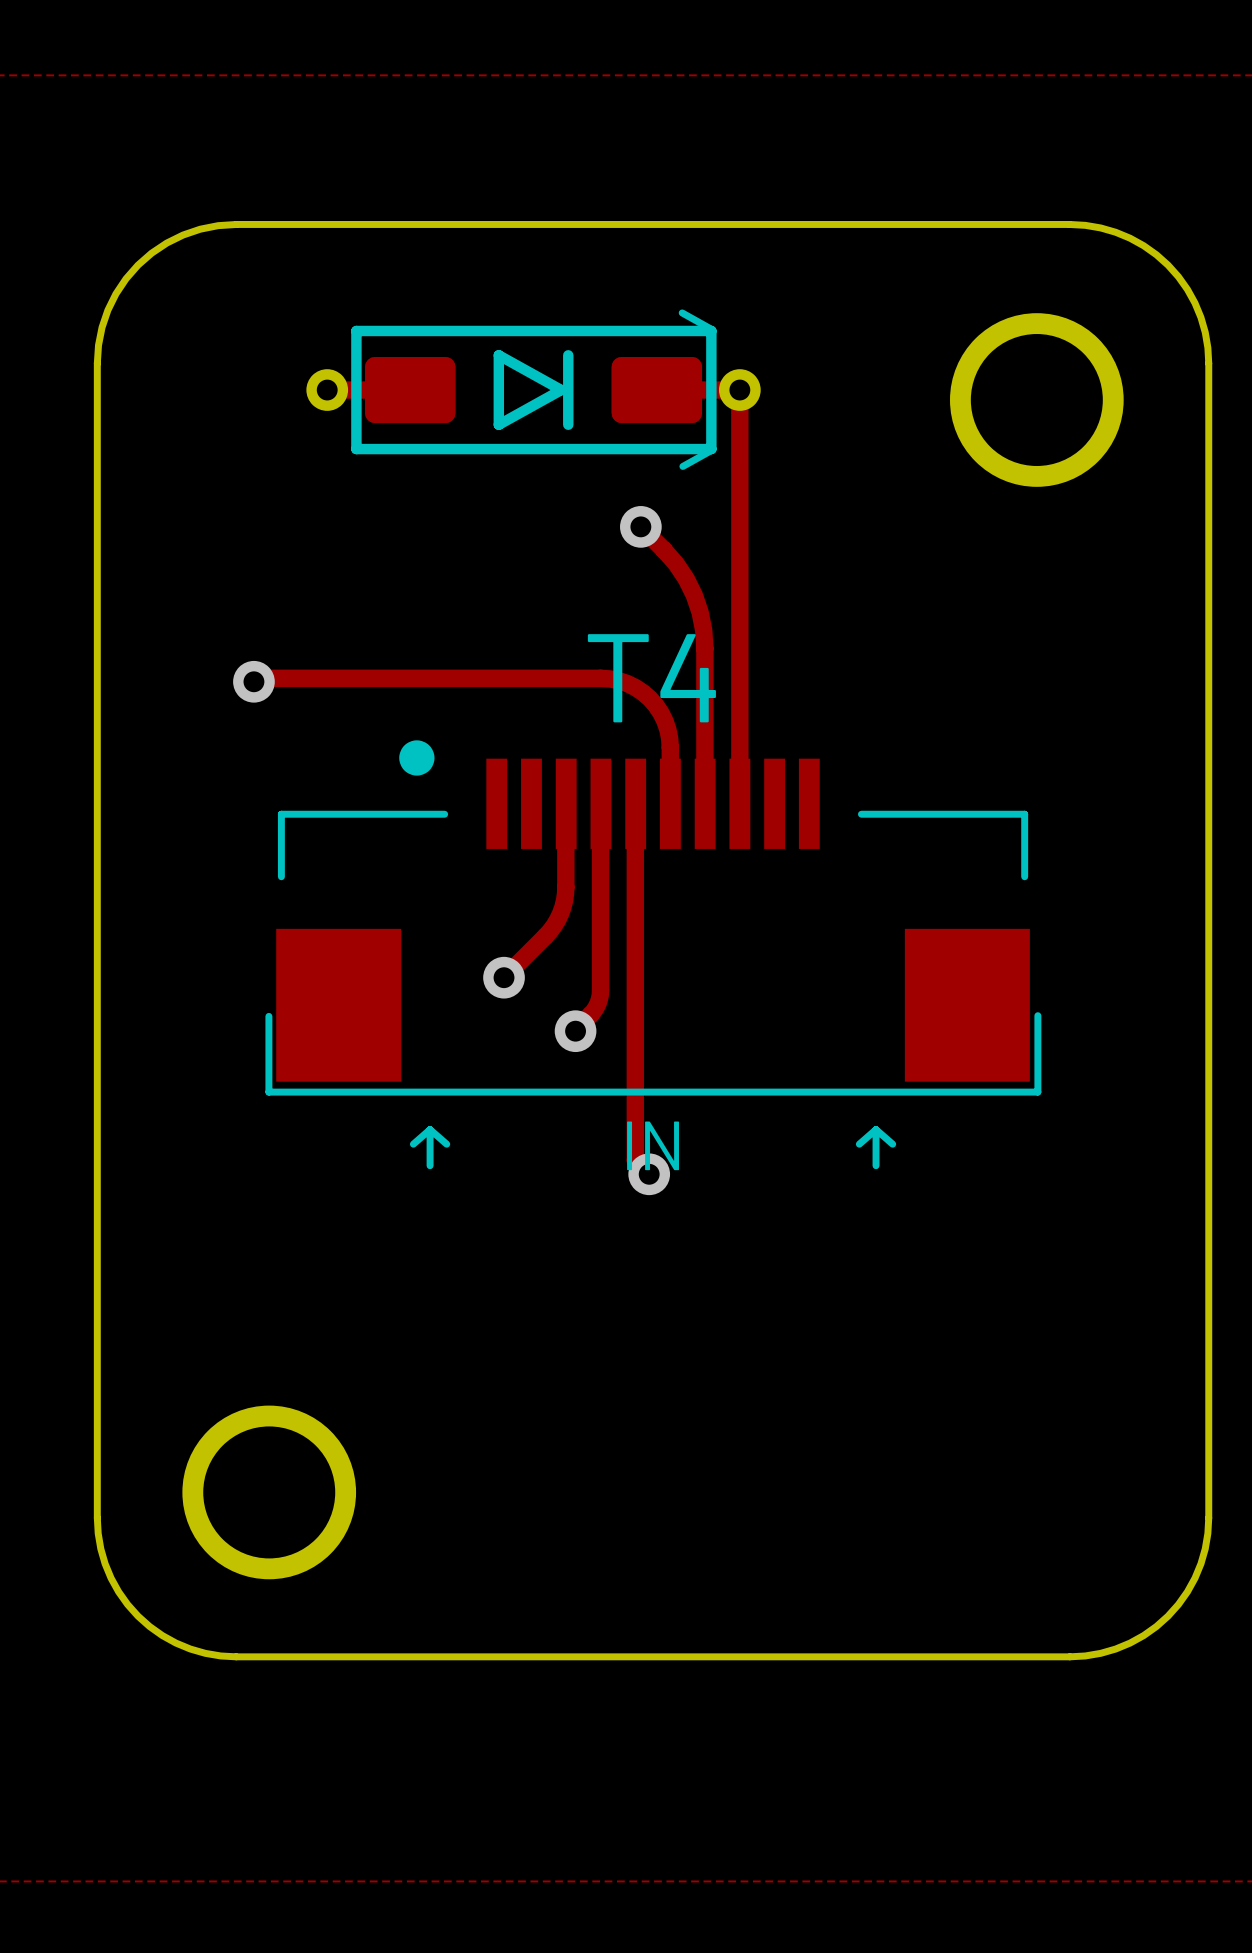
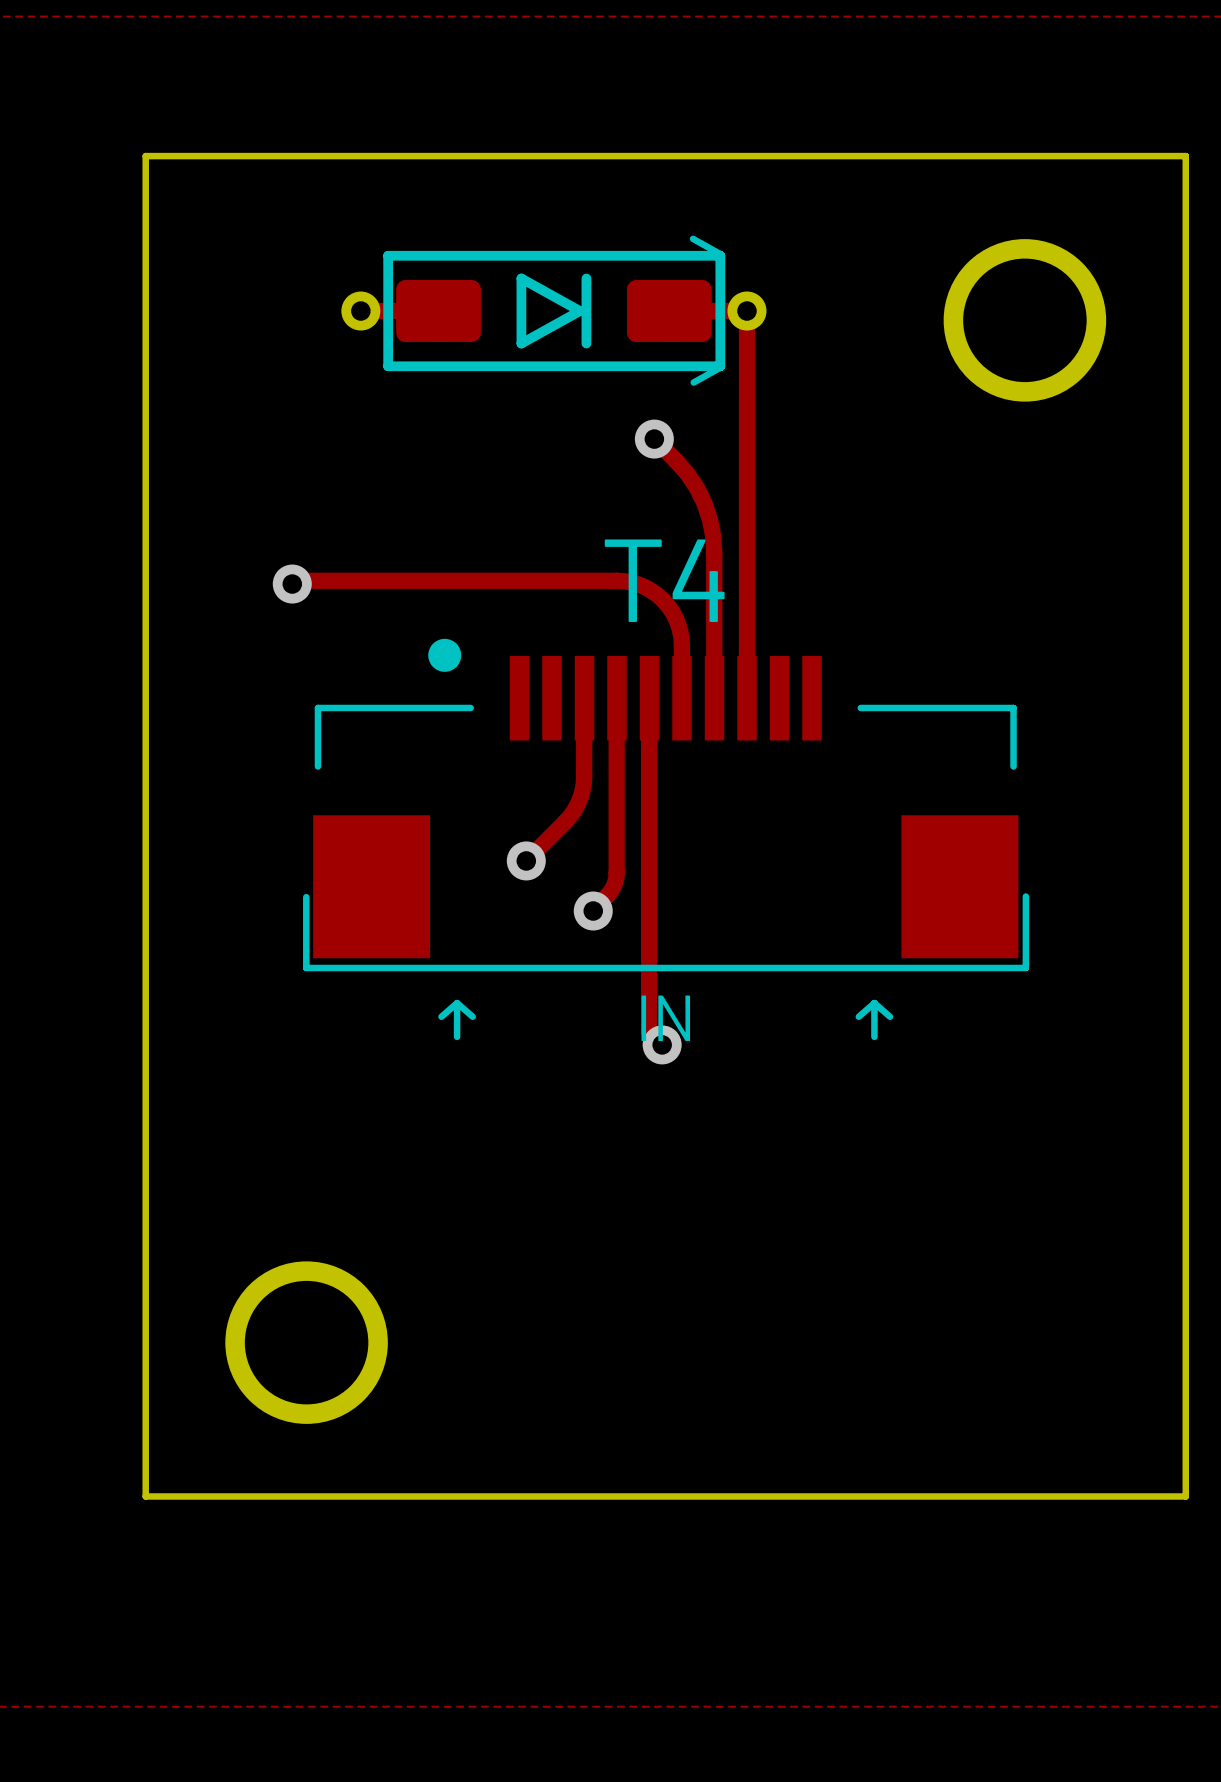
board edge: (236, 224) (200, 229) (183, 235) (166, 243) (138, 265) (115, 293) (107, 310) (98, 345) (97, 363) -> (275, 156) (145, 156) (145, 286)
board edge: (1069, 224) (1085, 225) (1115, 232) (1143, 245) (1168, 265) (1187, 289) (1200, 317) (1207, 347) (1208, 363) -> (1055, 156) (1185, 156) (1185, 286)
board edge: (97, 1517) (98, 1533) (105, 1563) (118, 1591) (138, 1616) (162, 1635) (190, 1649) (205, 1653) (236, 1656) -> (145, 1366) (145, 1496) (275, 1496)
board edge: (1208, 1517) (1205, 1548) (1194, 1578) (1187, 1591) (1168, 1616) (1143, 1635) (1115, 1649) (1085, 1655) (1069, 1656) -> (1185, 1366) (1185, 1496) (1055, 1496)

